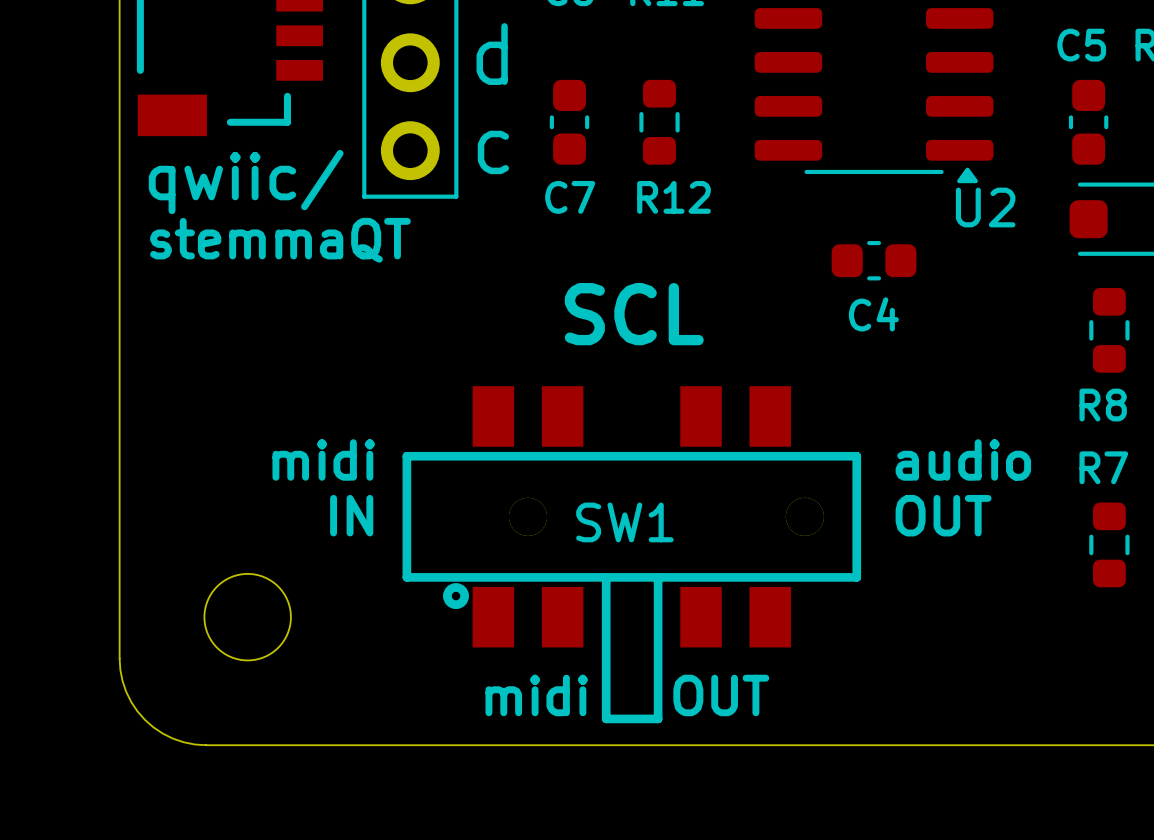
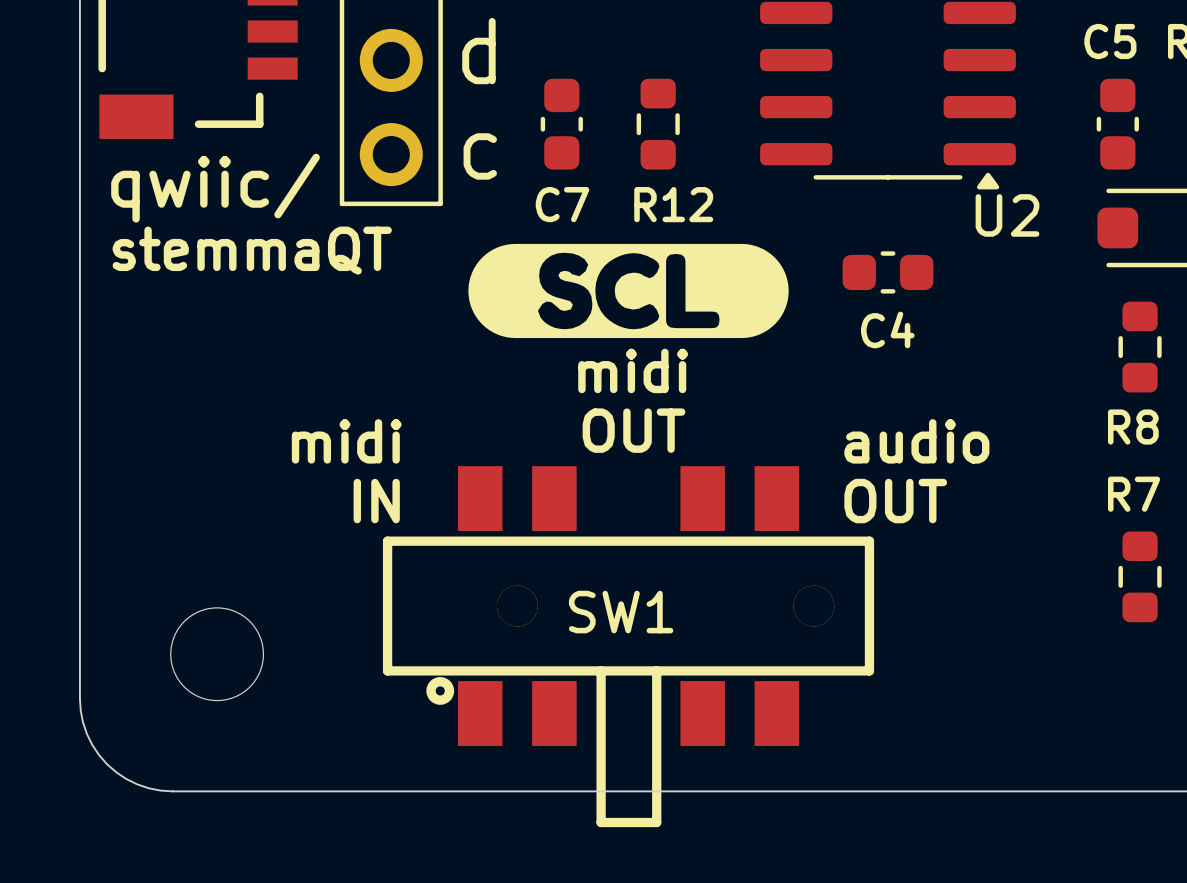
drawing: none -> [468, 243, 789, 339]
text: SCL (634, 314) -> none
text: none -> midi (633, 370)
text: none -> OUT (634, 430)
text position: midi (323, 459) -> midi (346, 441)
text position: audio (963, 459) -> audio (916, 441)
text position: IN (351, 515) -> IN (376, 501)
text position: OUT (943, 515) -> OUT (895, 501)
SW1 position: (631, 554) -> (628, 646)
text: midi OUT (627, 695) -> none

